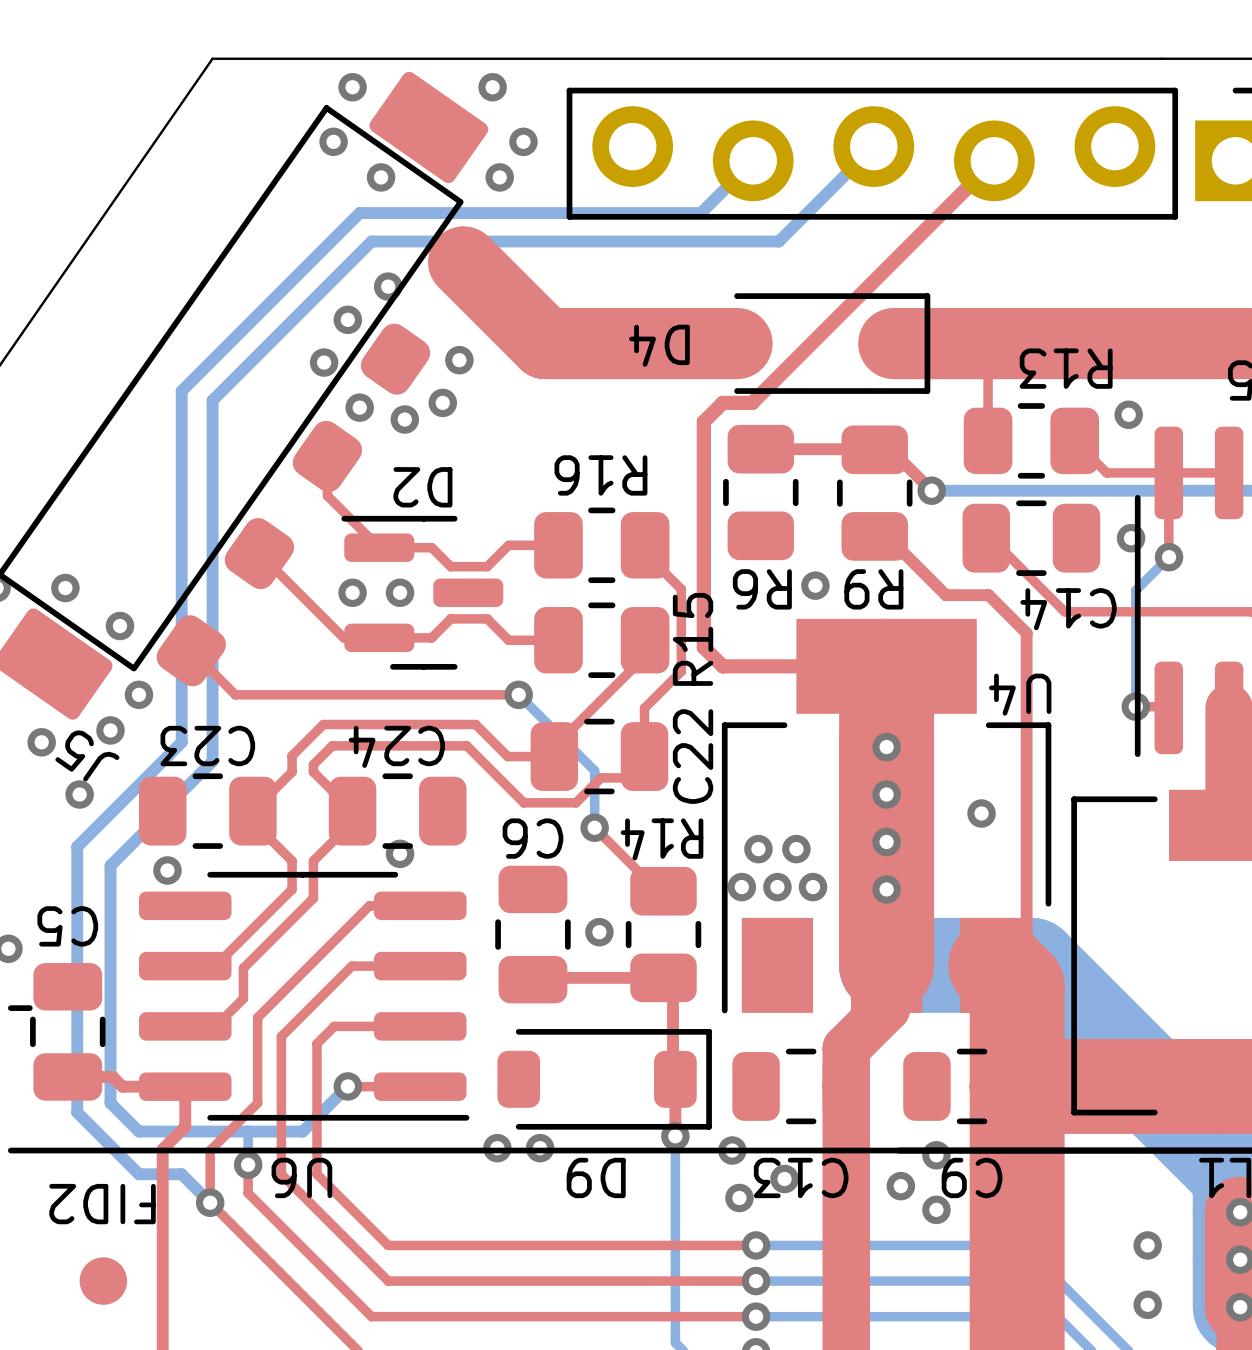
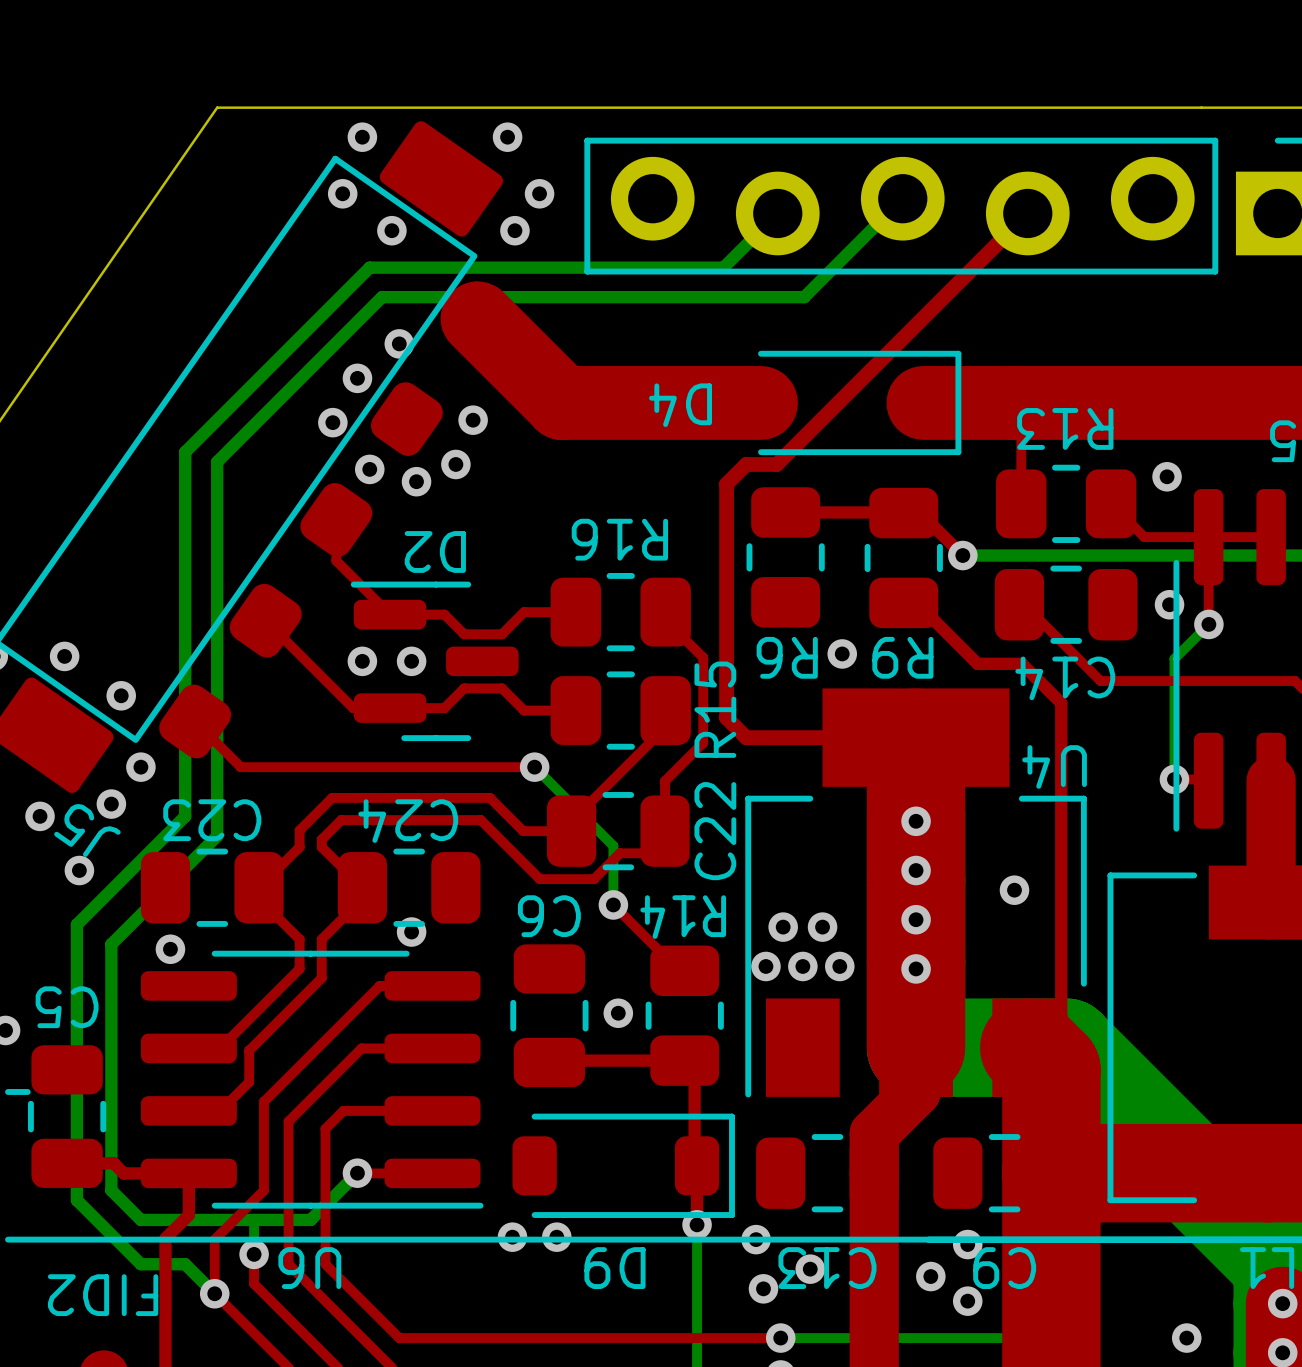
R13 name position: R13 (1066, 368) -> R13 (1065, 428)
C14 name position: C14 (1068, 609) -> C14 (1065, 678)

